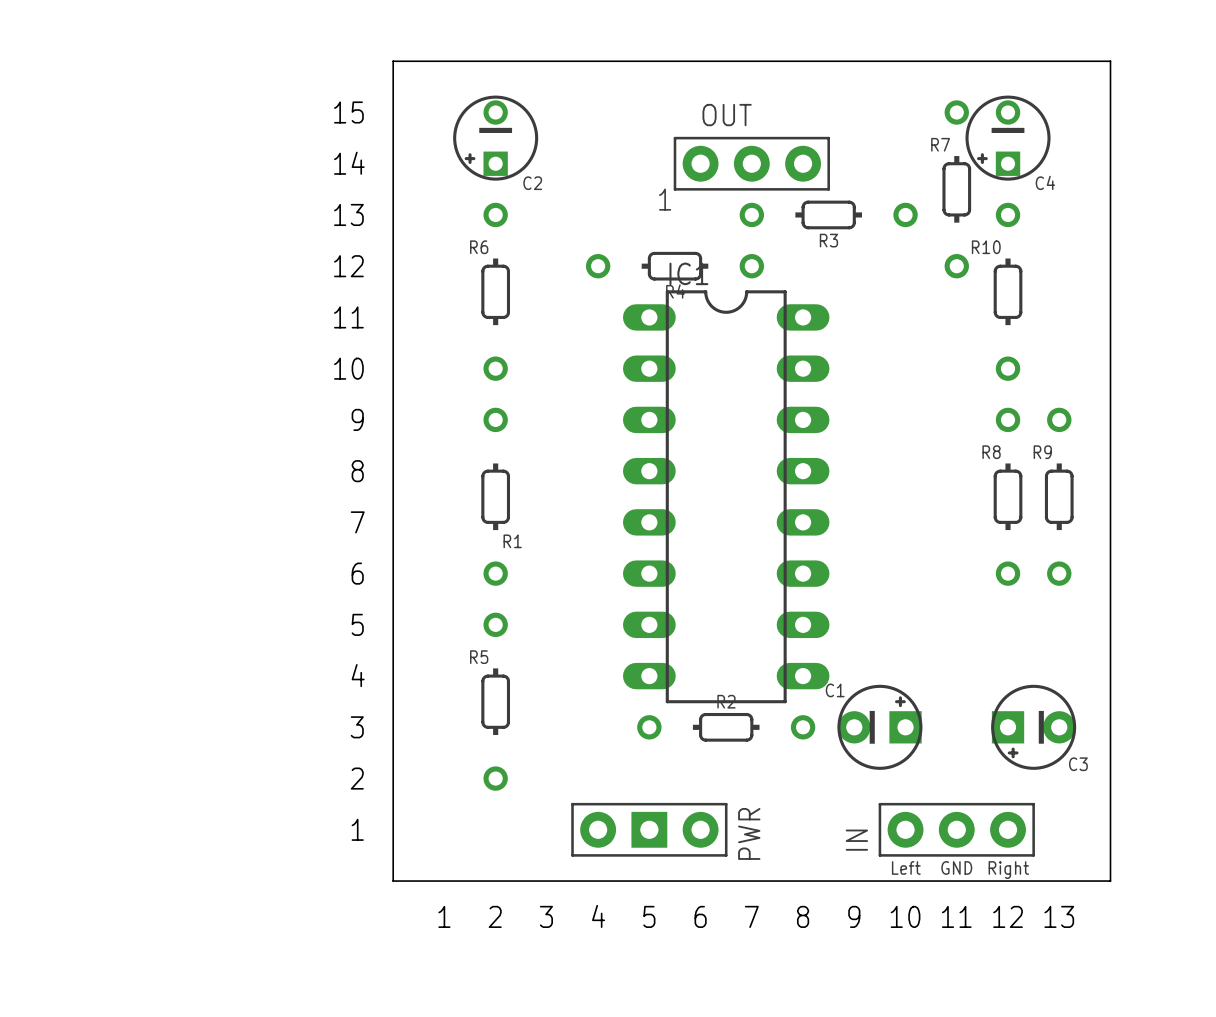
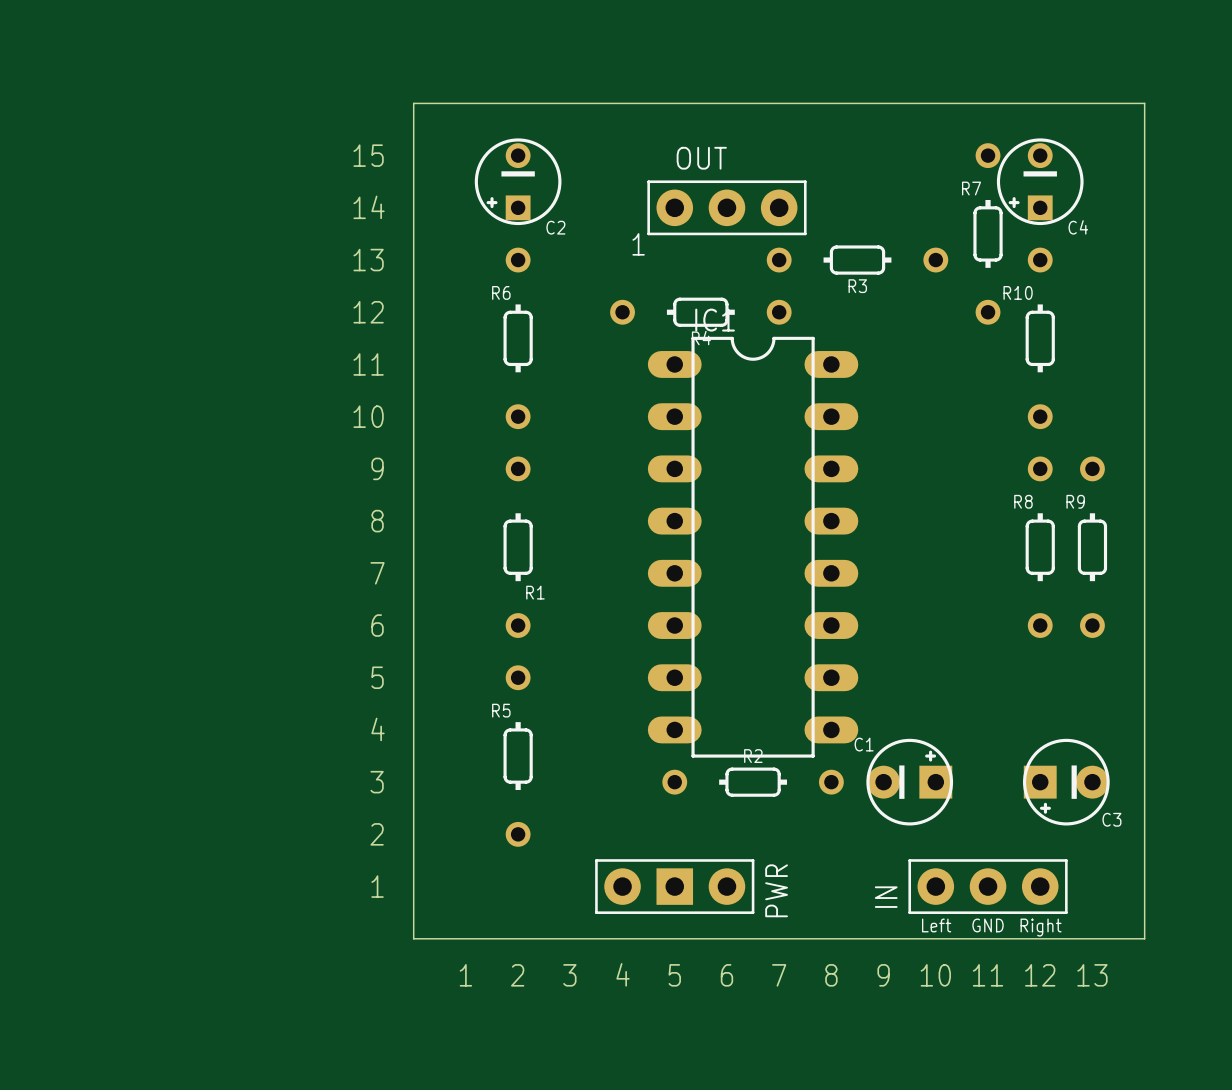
OUT position: (751, 163) -> (726, 207)

